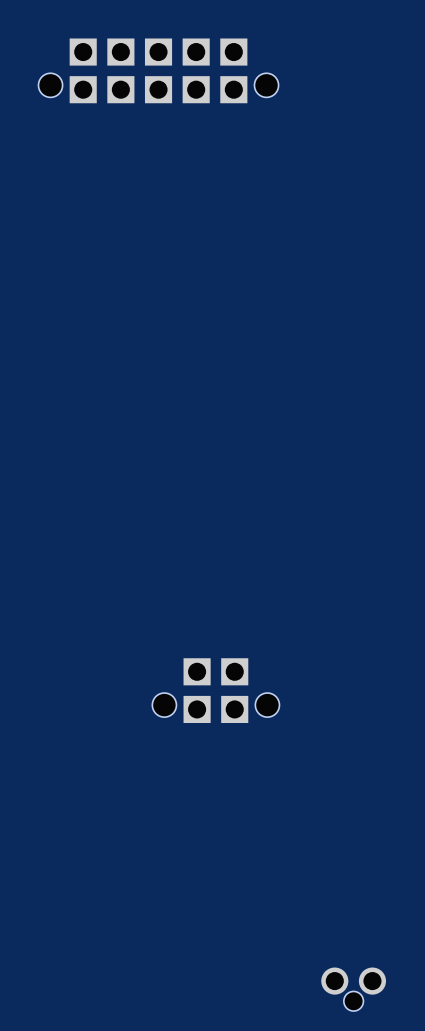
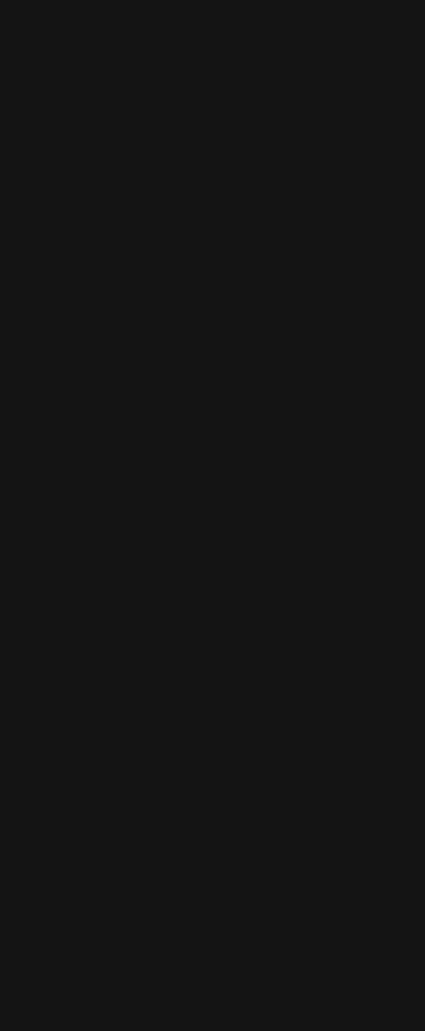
part: (158, 70) -> none
part: (215, 690) -> none
part: (353, 989) -> none

